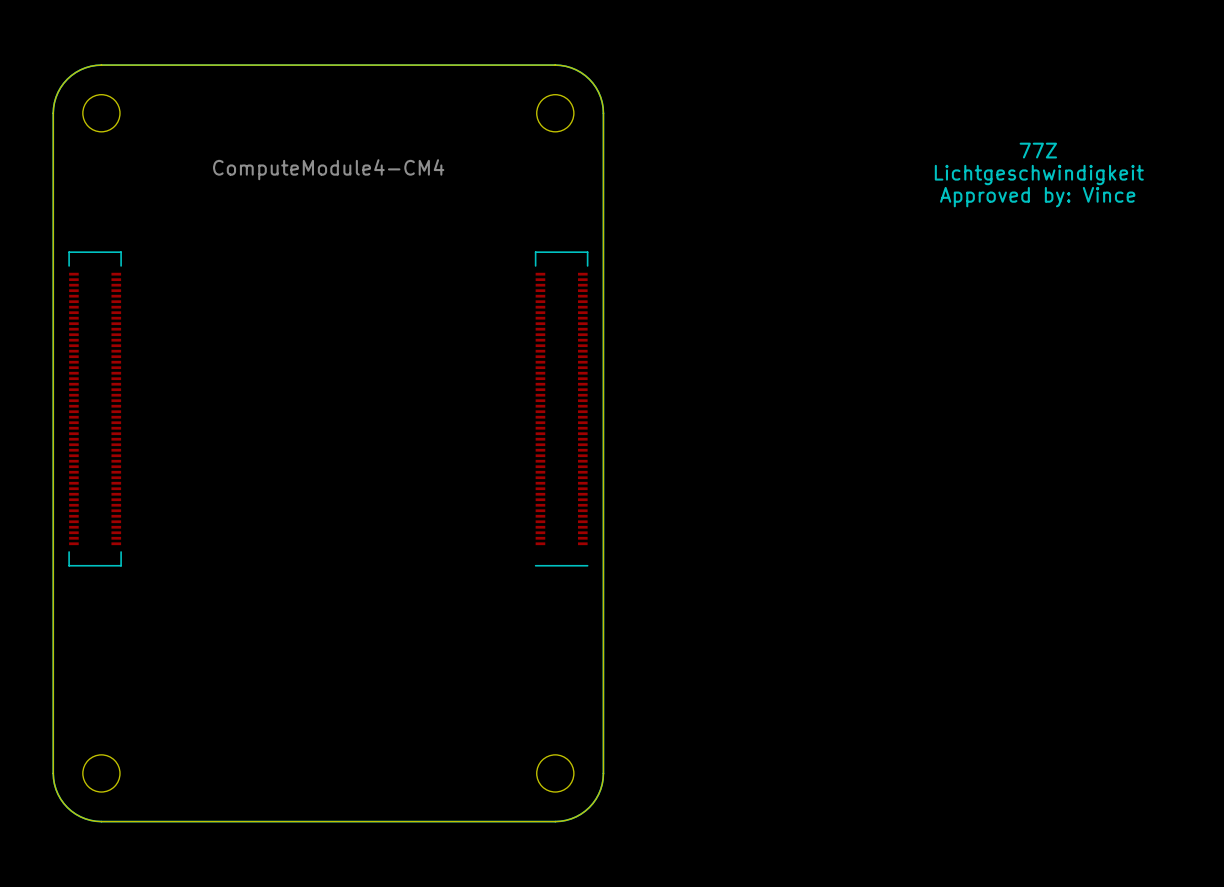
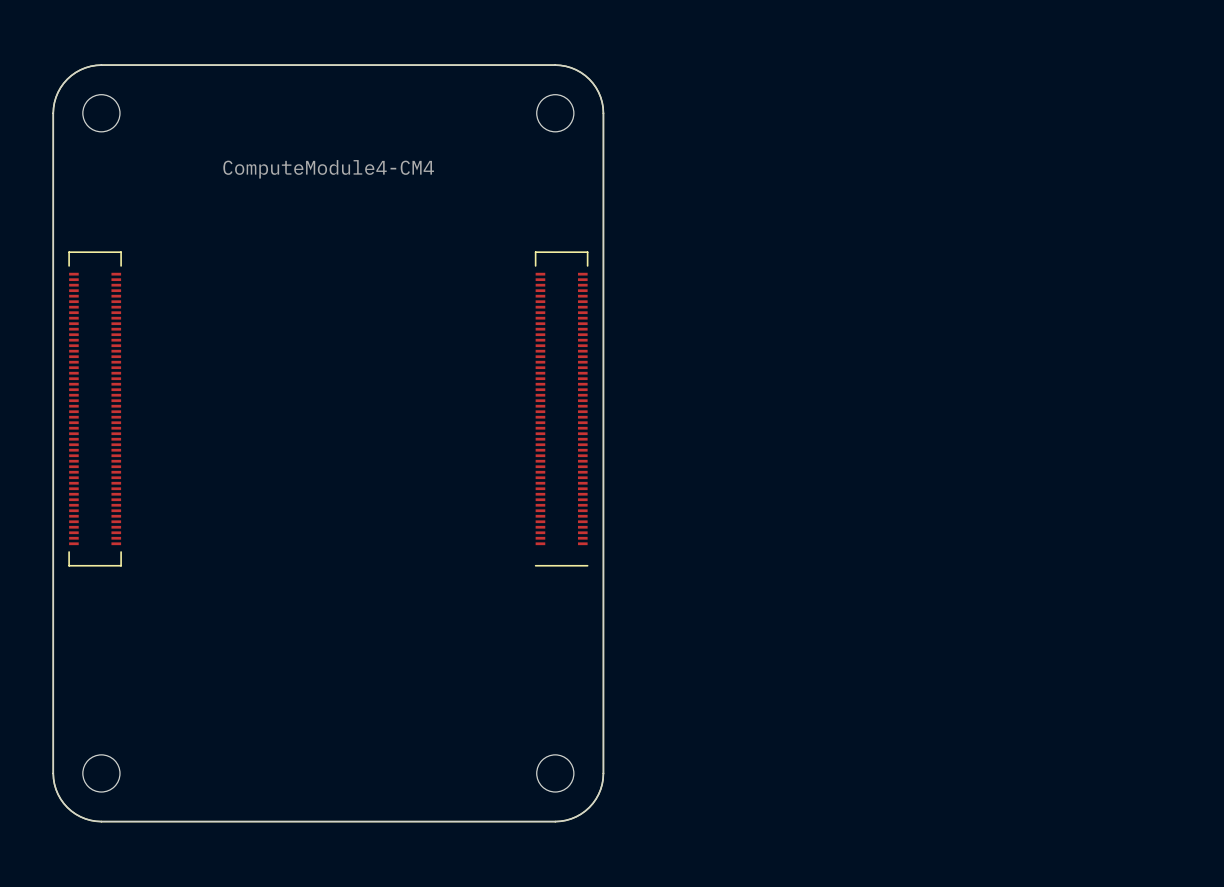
text: 77Z (1038, 150) -> none
text: Lichtgeschwindigkeit (1039, 175) -> none
text: Approved by: Vince (1037, 197) -> none

